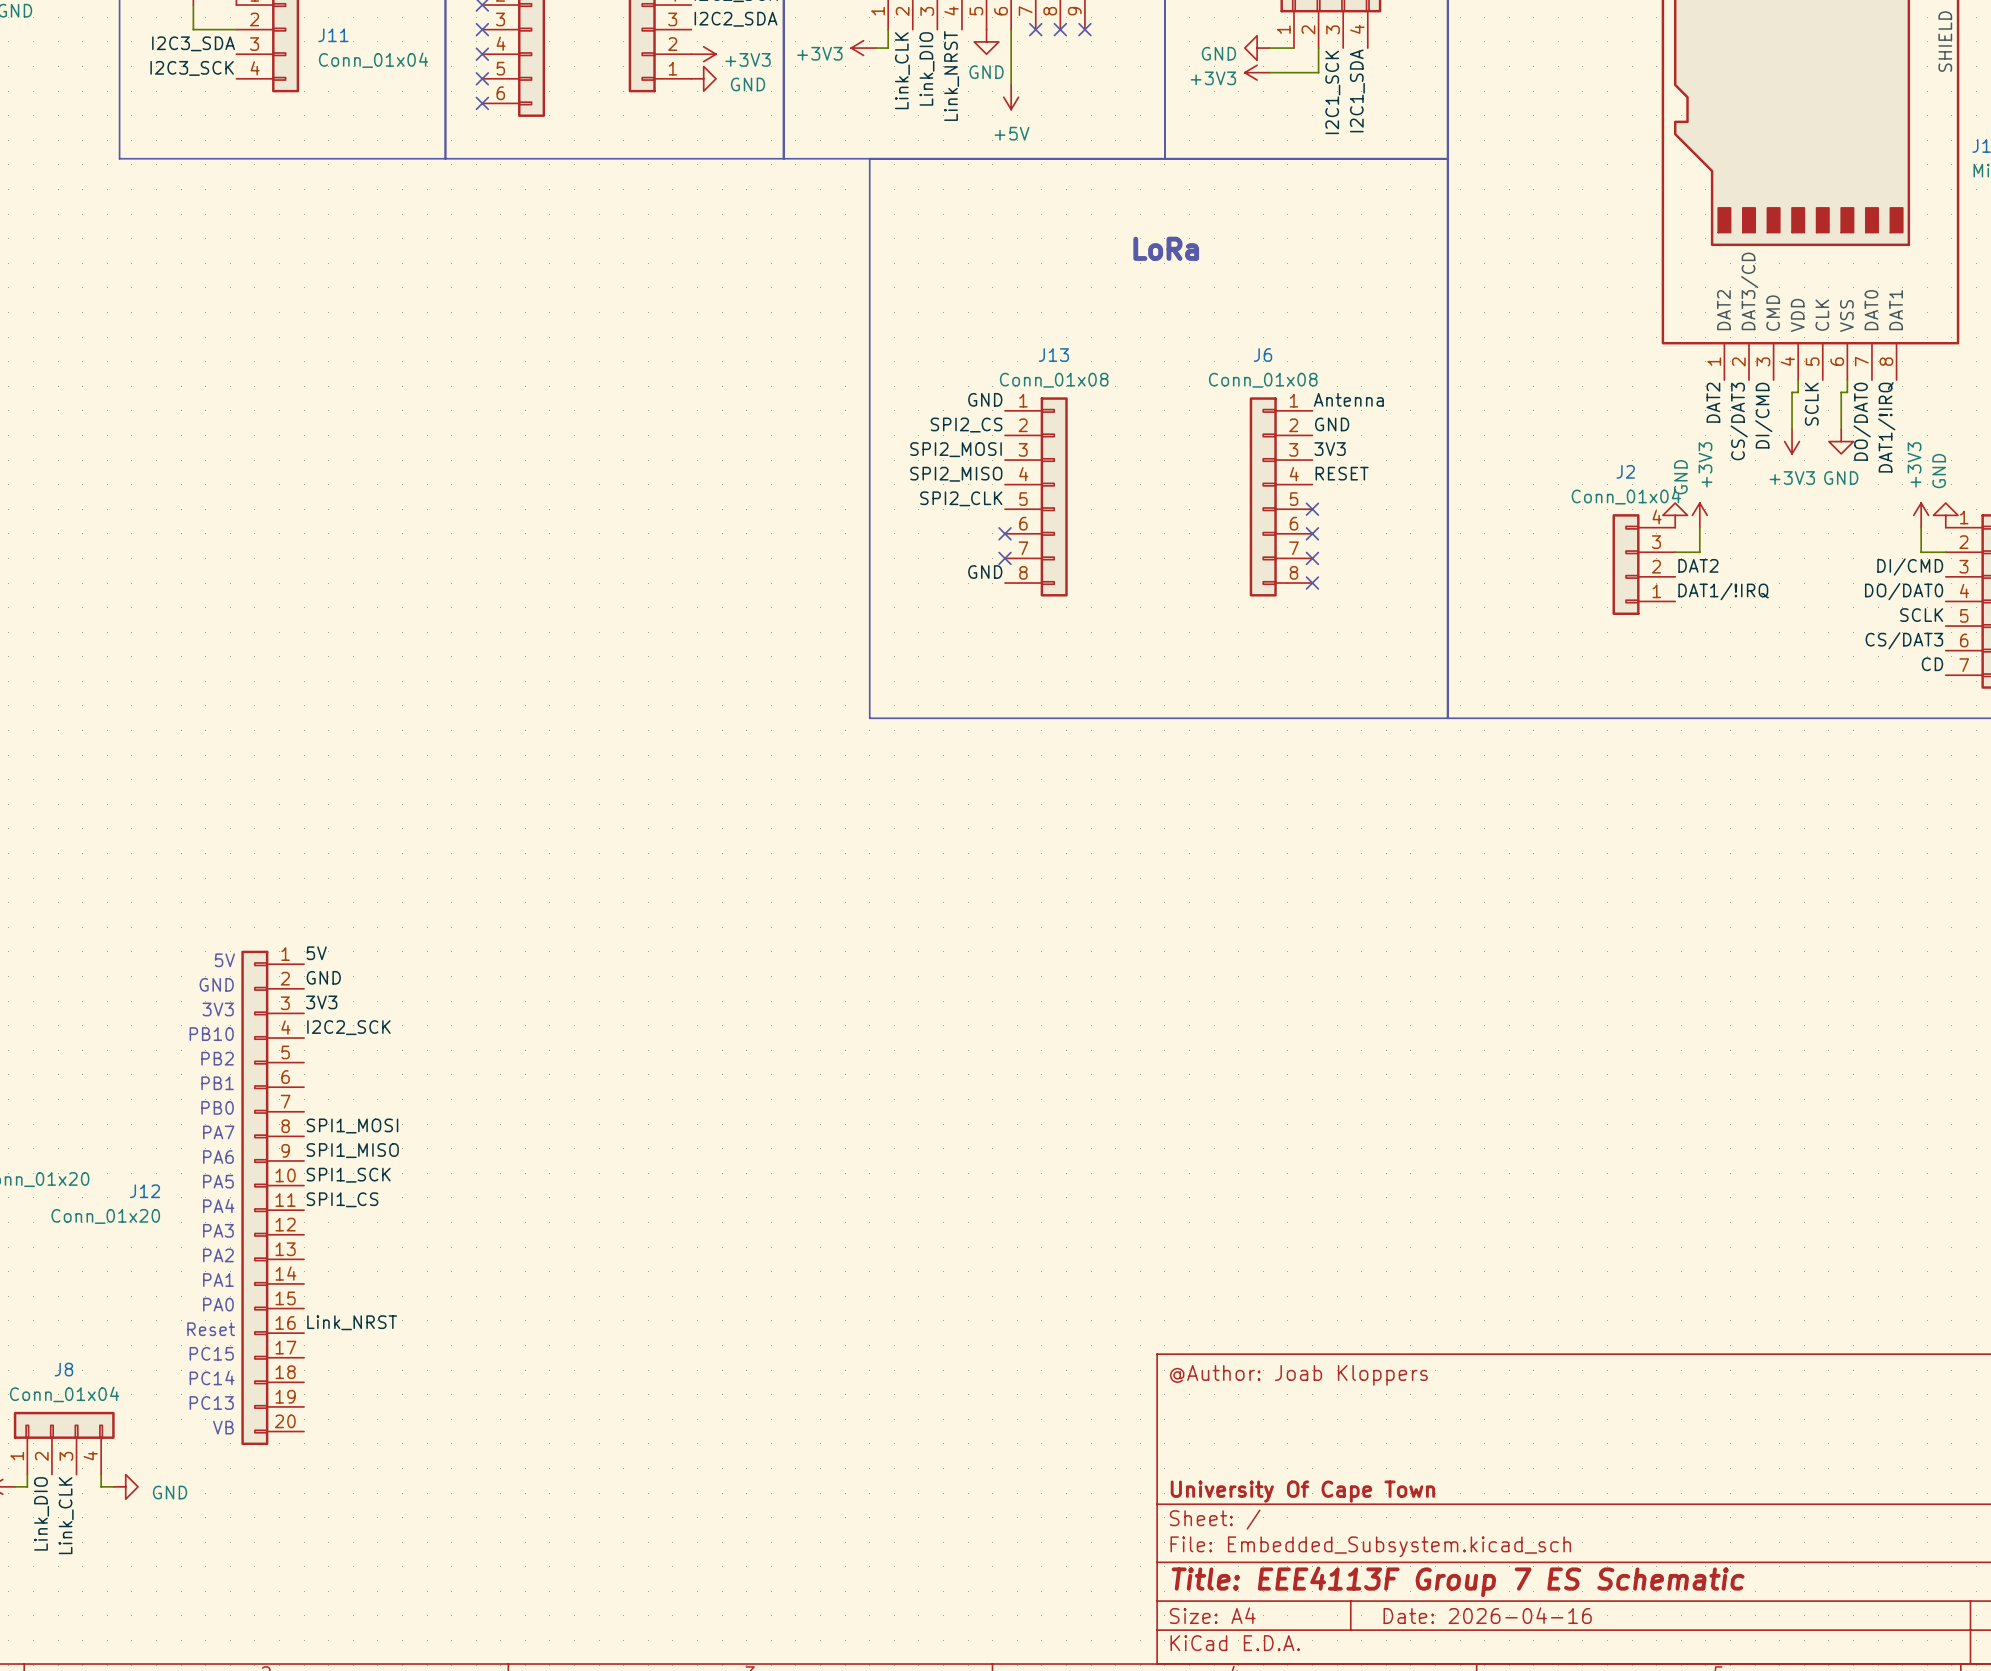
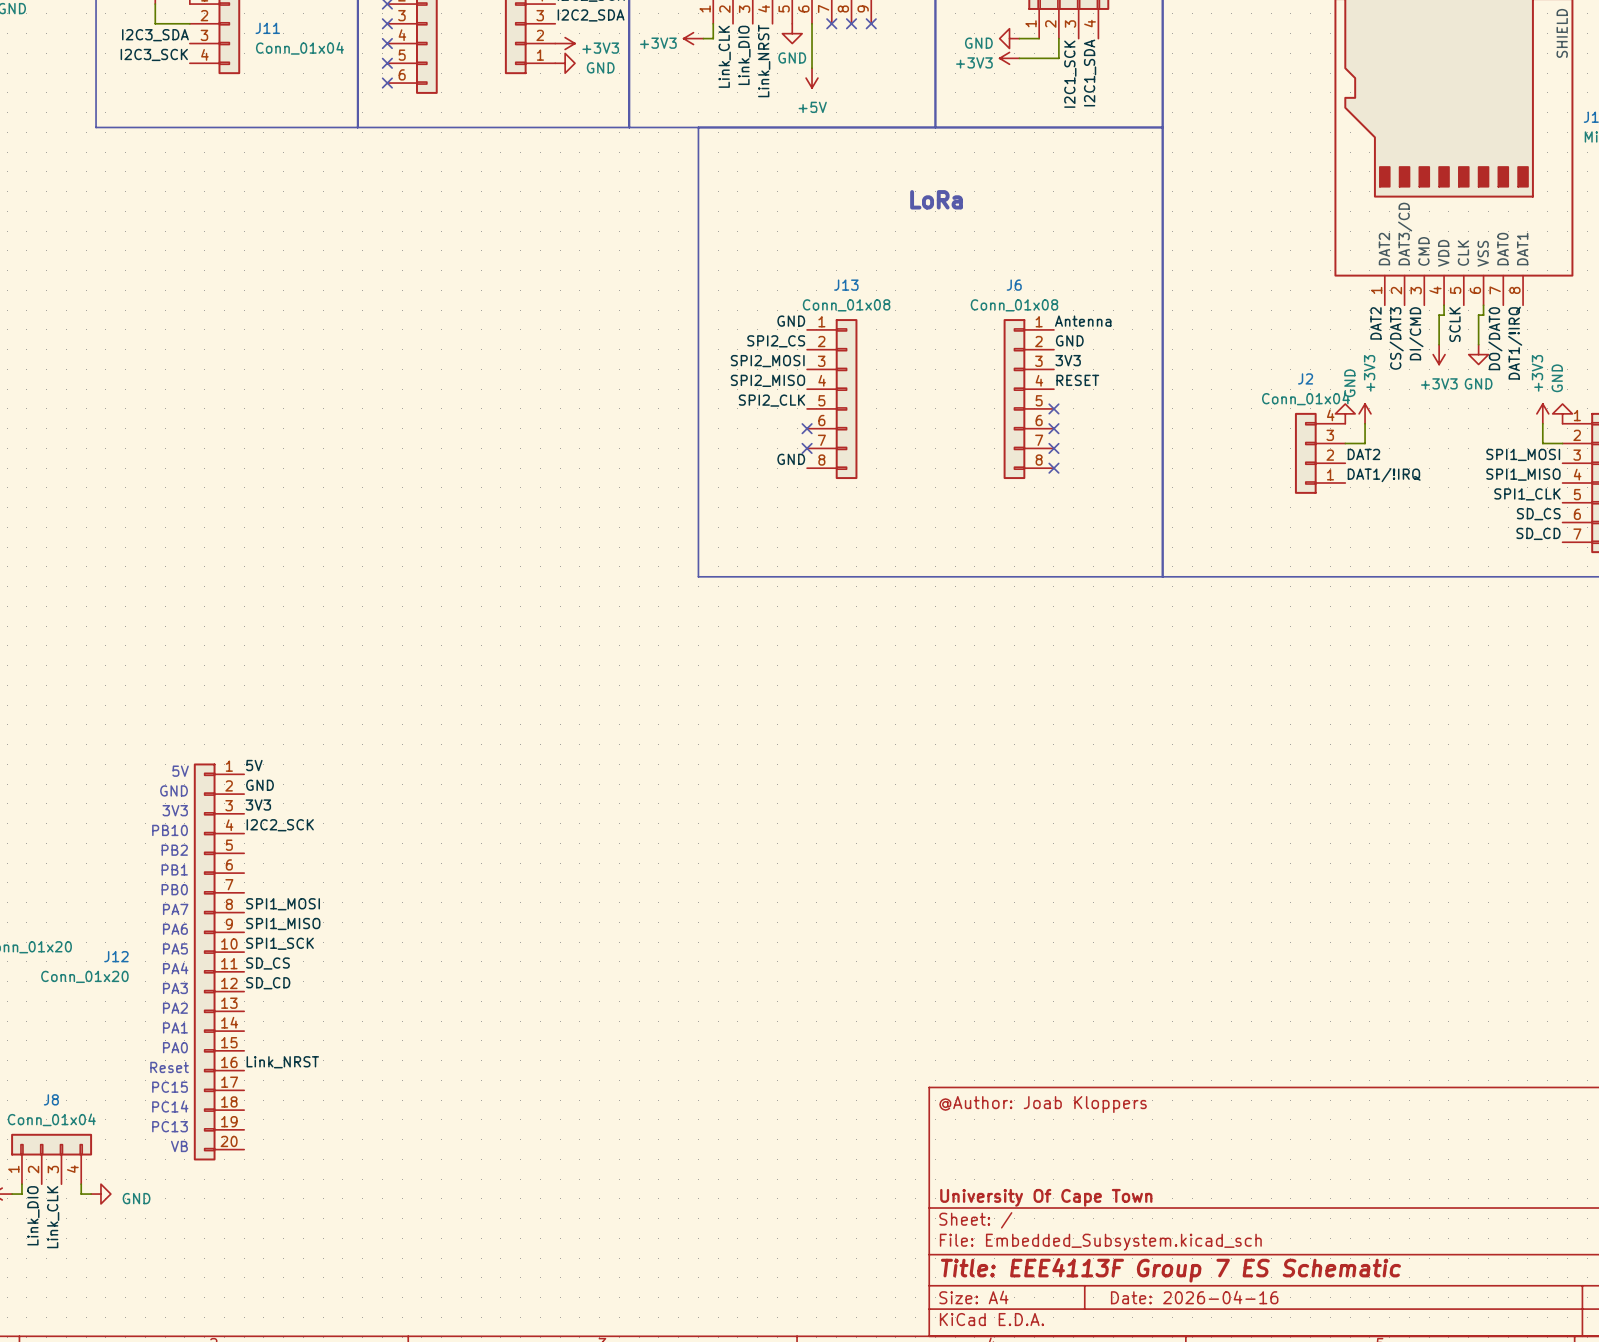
label: DI/CMD (1910, 567) -> SPI1_MOSI (1523, 454)
label: DO/DAT0 (1904, 591) -> SPI1_MISO (1523, 474)
label: SCLK (1921, 615) -> SPI1_CLK (1527, 494)
label: CS/DAT3 (1904, 640) -> SD_CS (1538, 514)
label: CD (1932, 664) -> SD_CD (1538, 533)
label: SPI1_CS (342, 1199) -> SD_CS (267, 963)
label: none -> SD_CD (268, 983)

